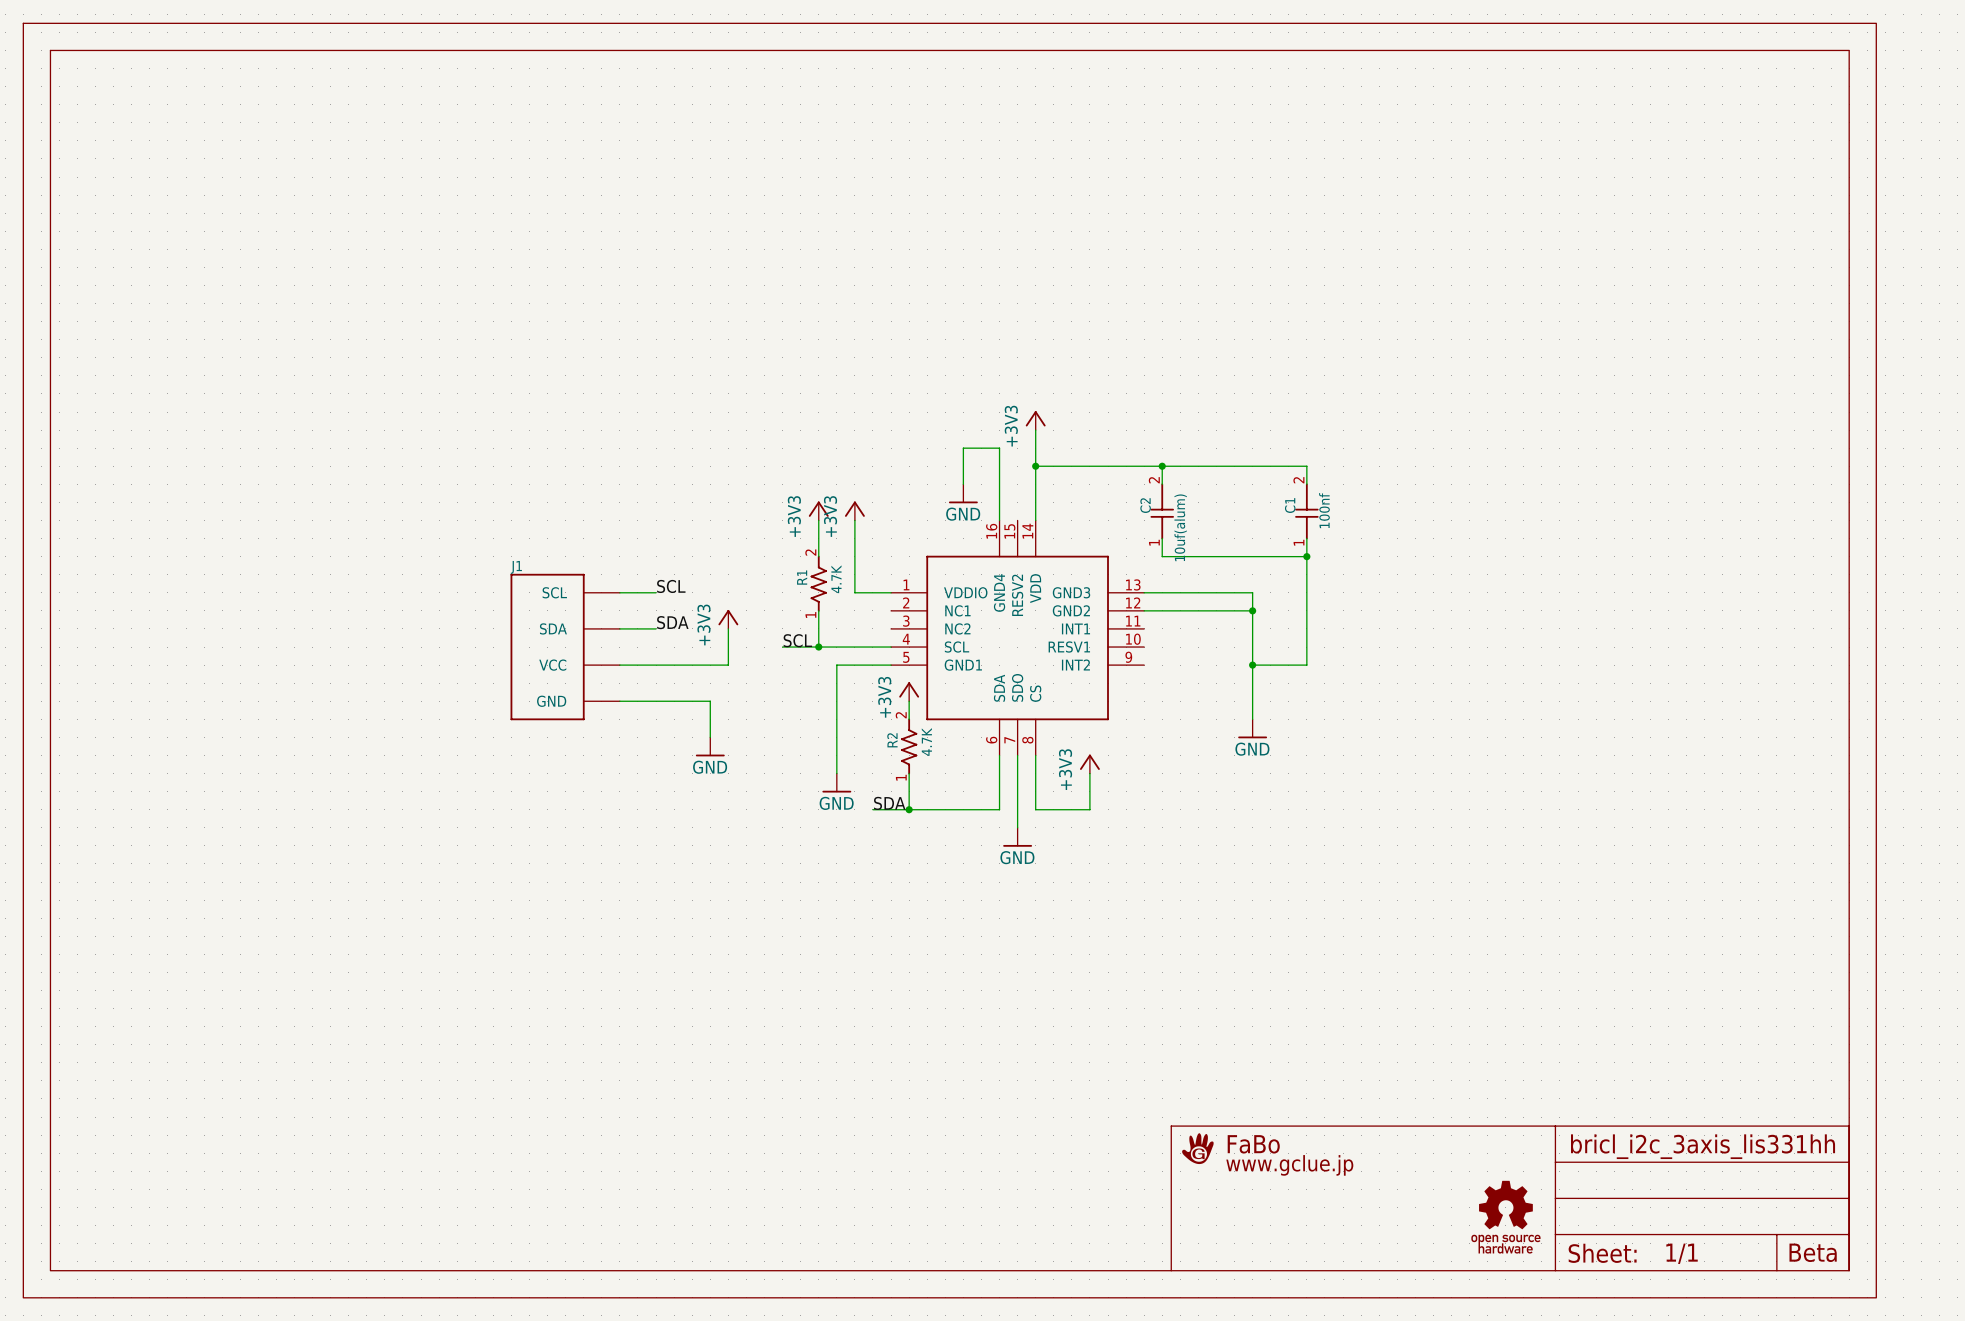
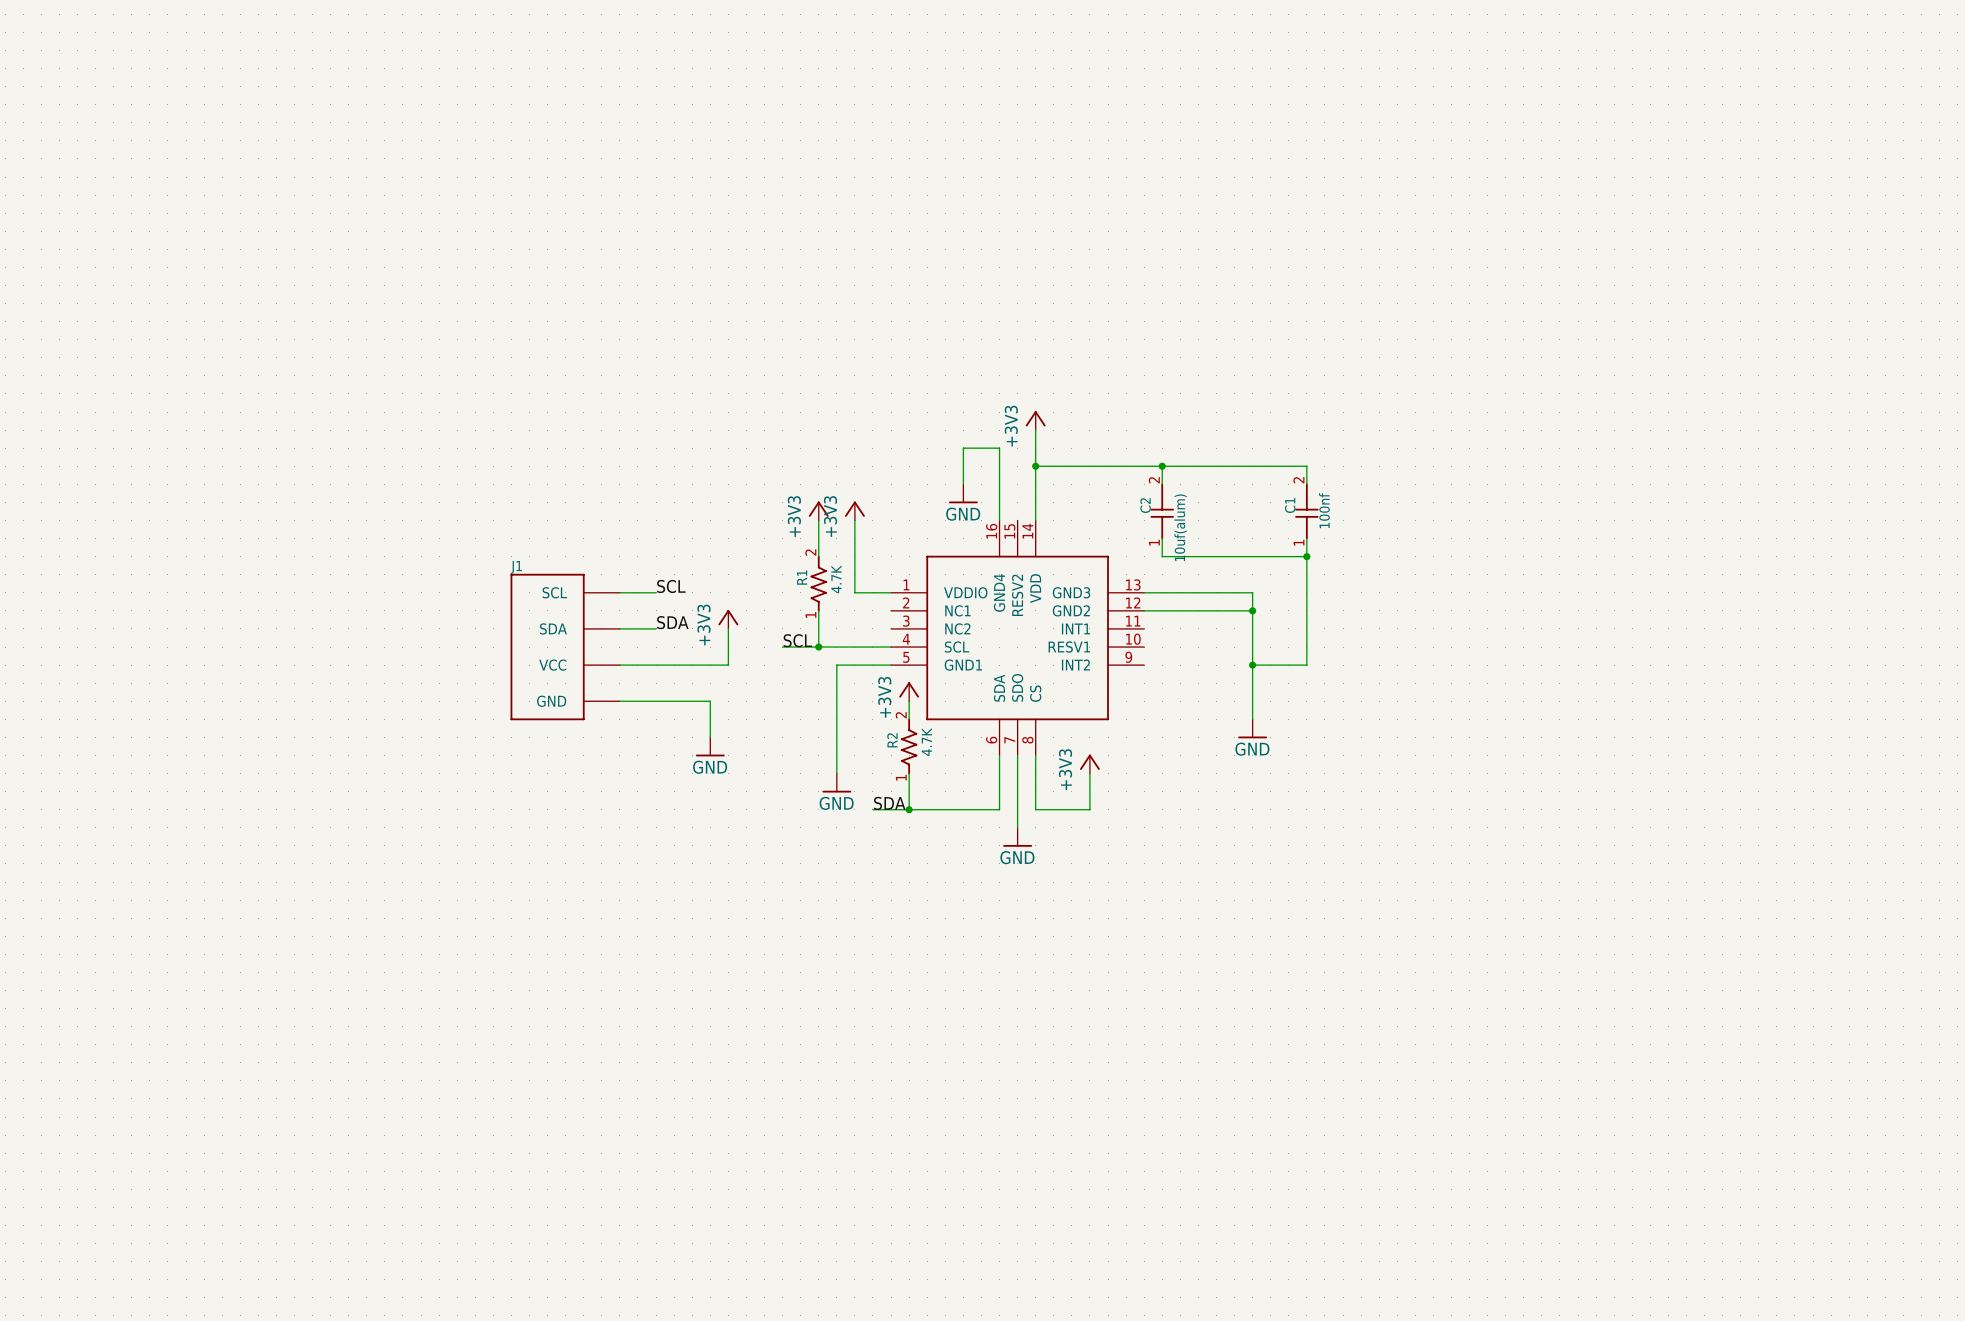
part: (949, 660) -> none
part: (1505, 1217) -> none
text: Beta (1813, 1252) -> none

